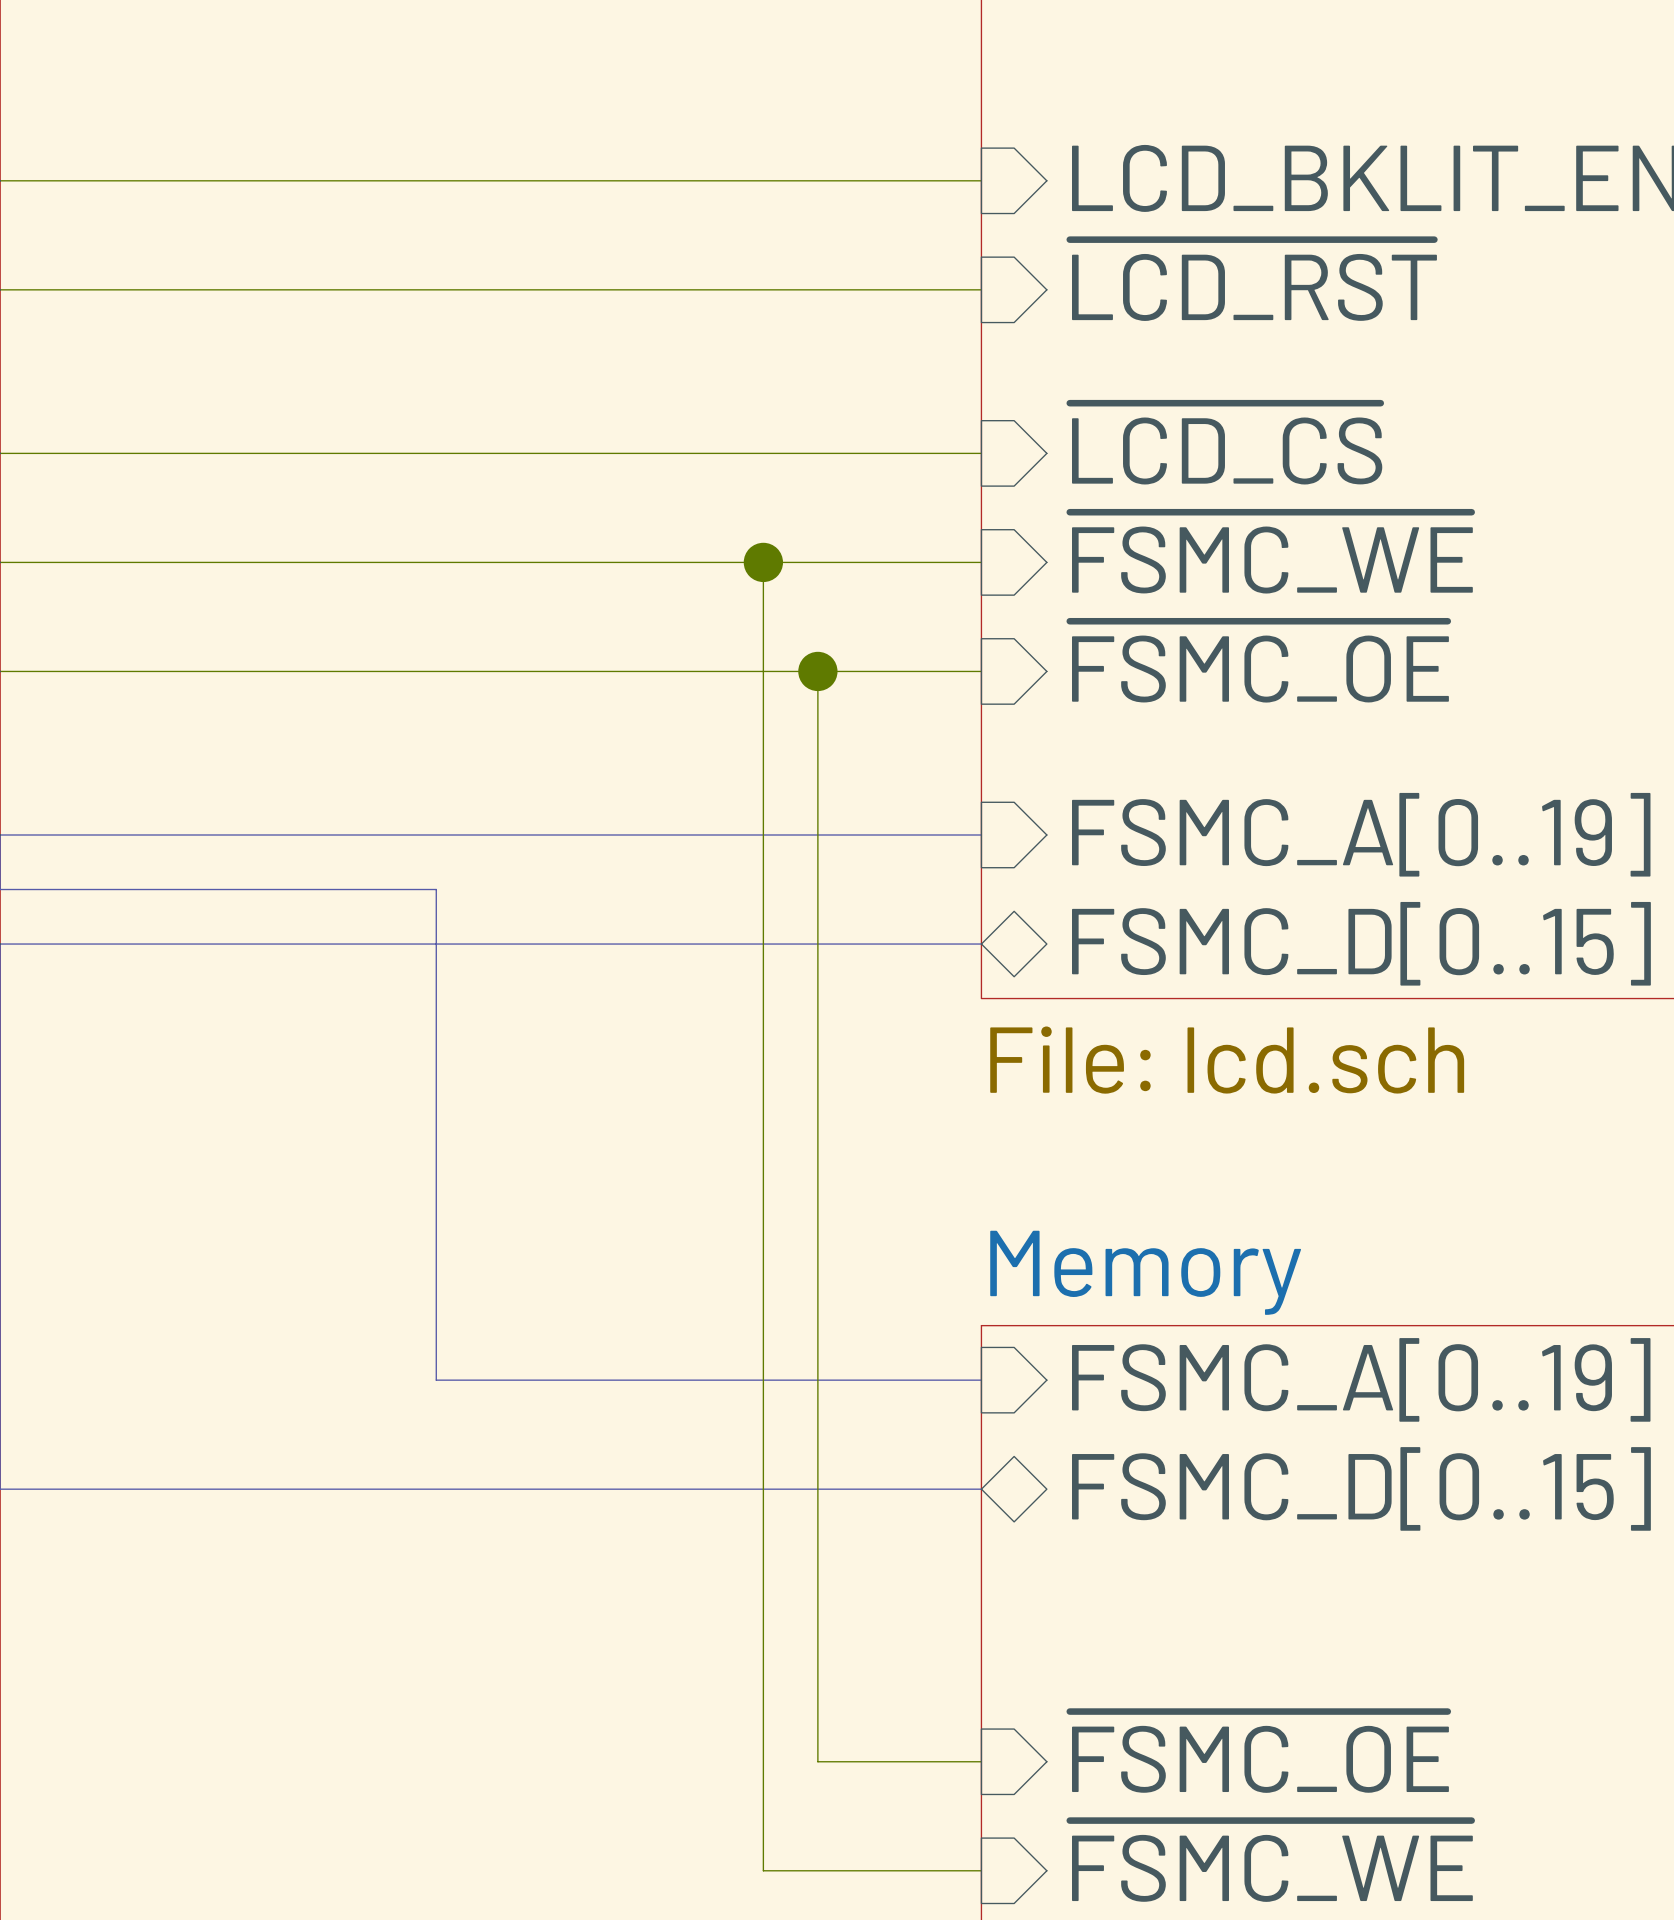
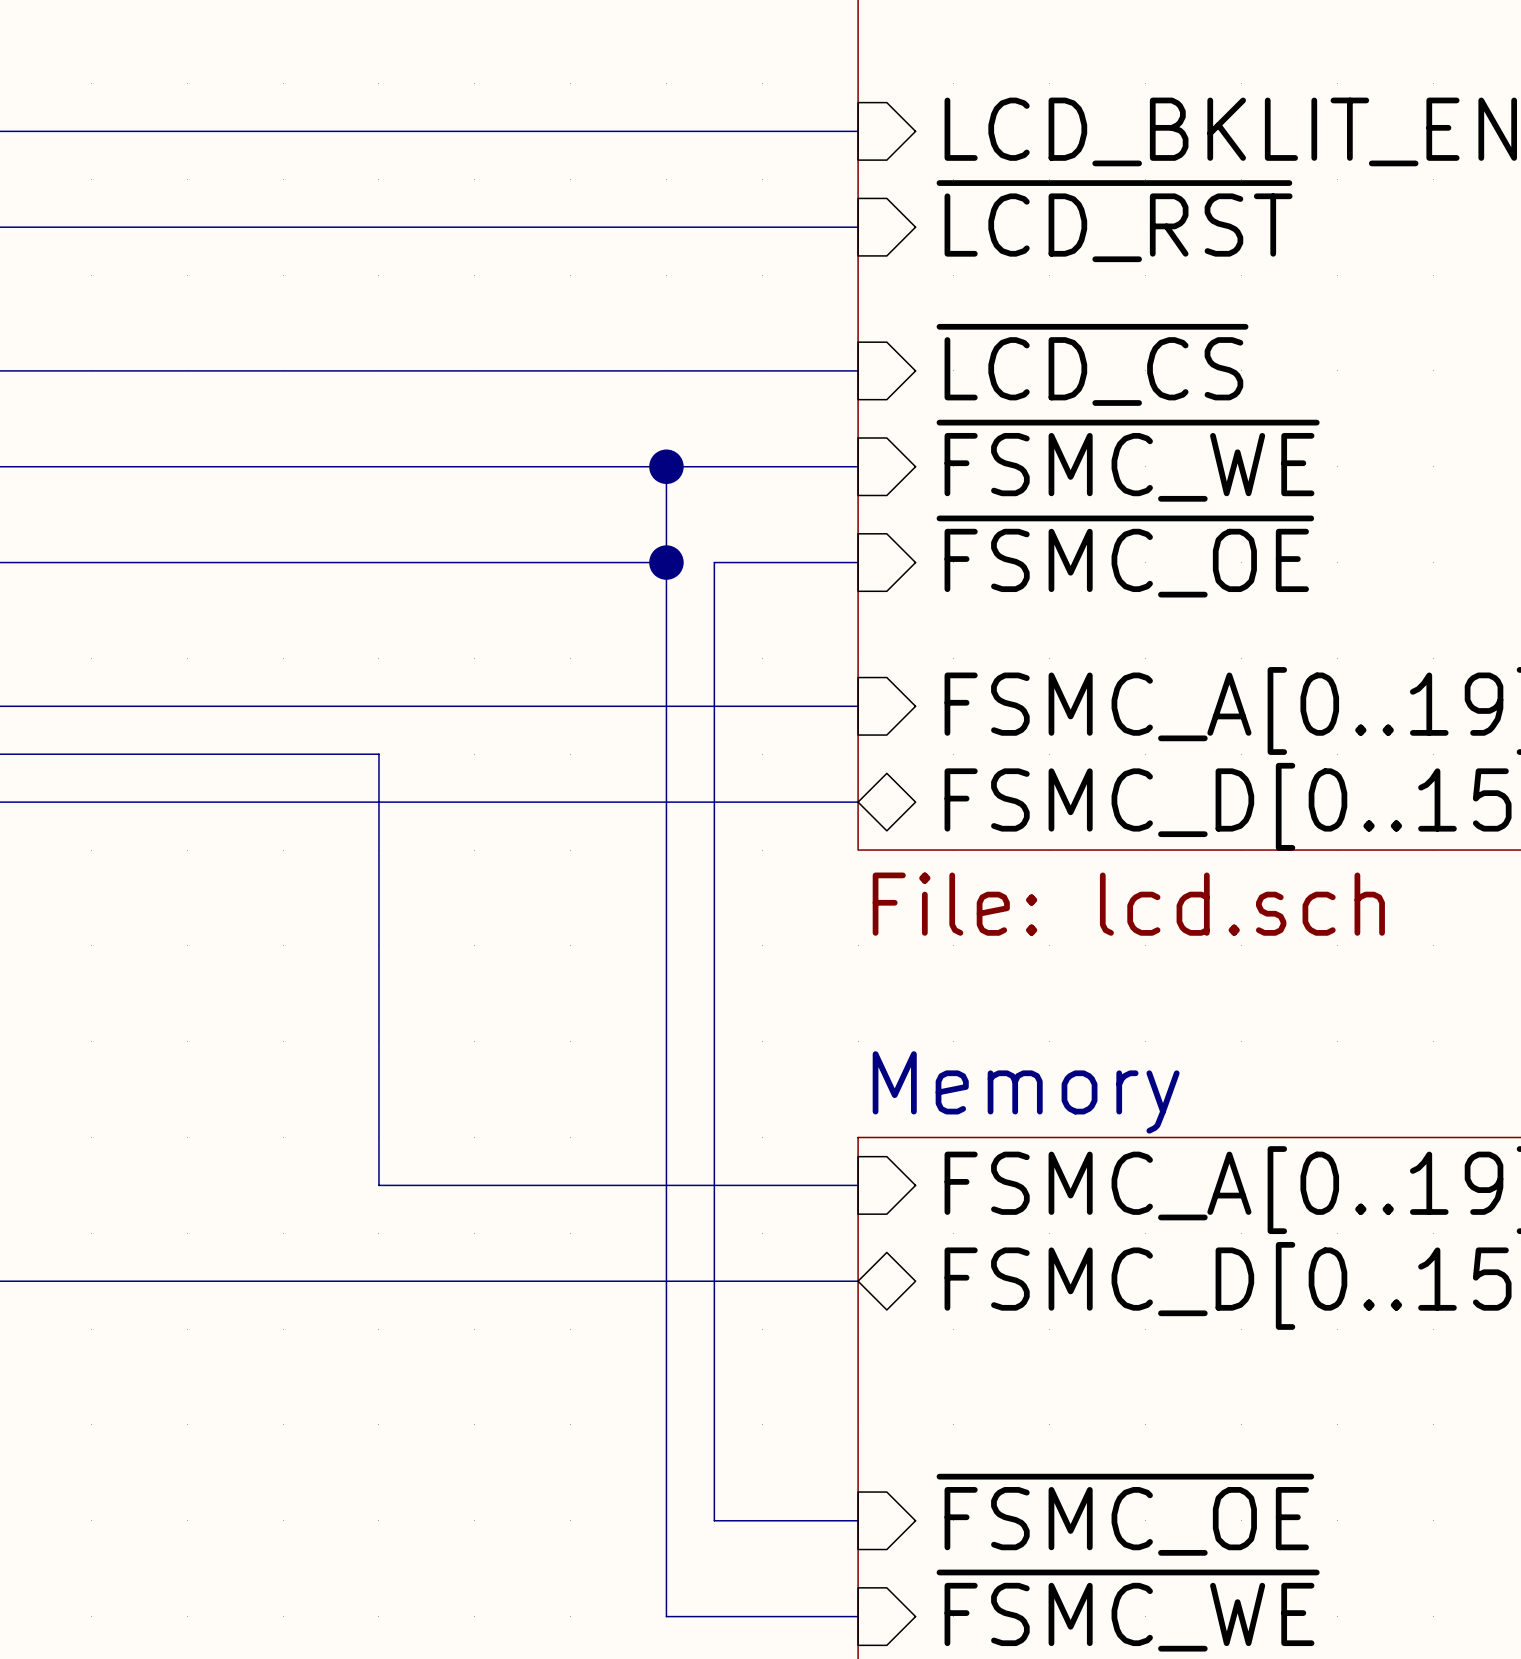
wire: (763, 671) (817, 671) -> none
junction position: (817, 671) -> (666, 562)

